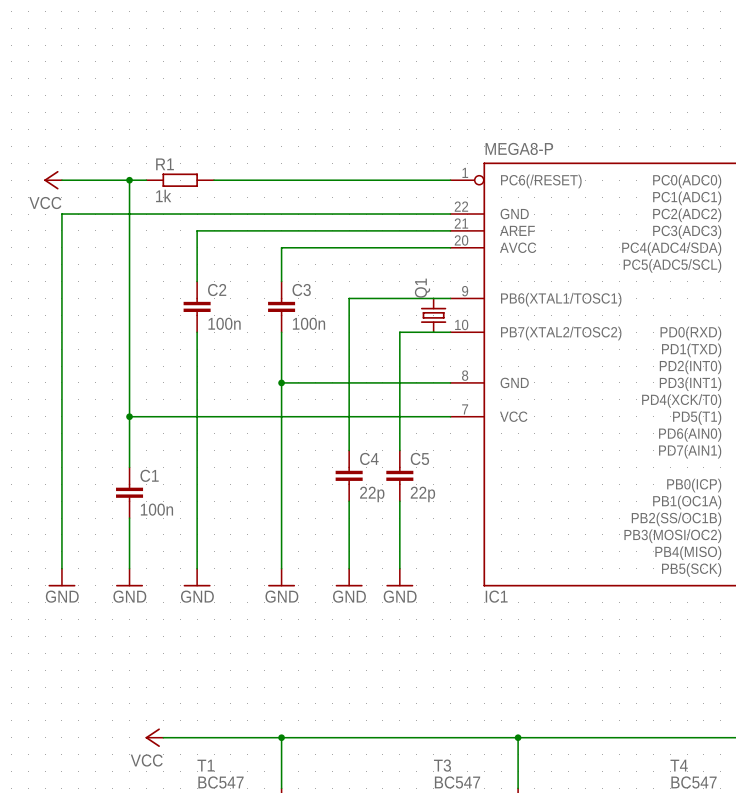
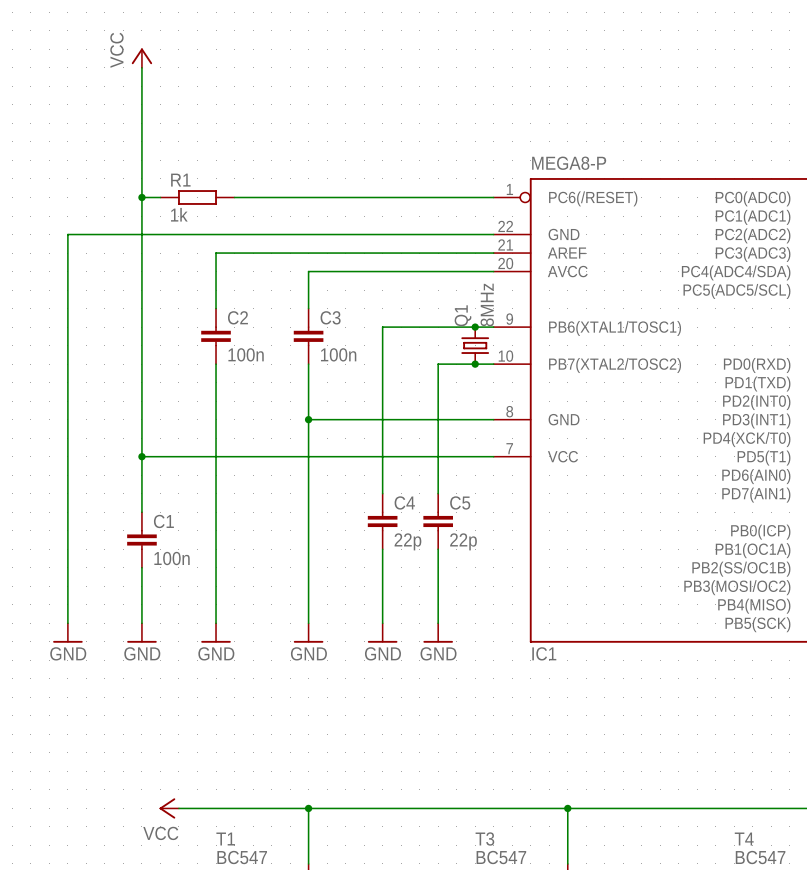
power symbol rotation: 0° (51, 180) -> 90° clockwise (141, 56)
power symbol position: VCC (53, 180) -> VCC (141, 58)
wire: (61, 180) (129, 180) -> (141, 67) (141, 197)
Q1 value: none -> 8MHz (487, 305)
junction: none -> (475, 327)
junction: none -> (475, 364)

